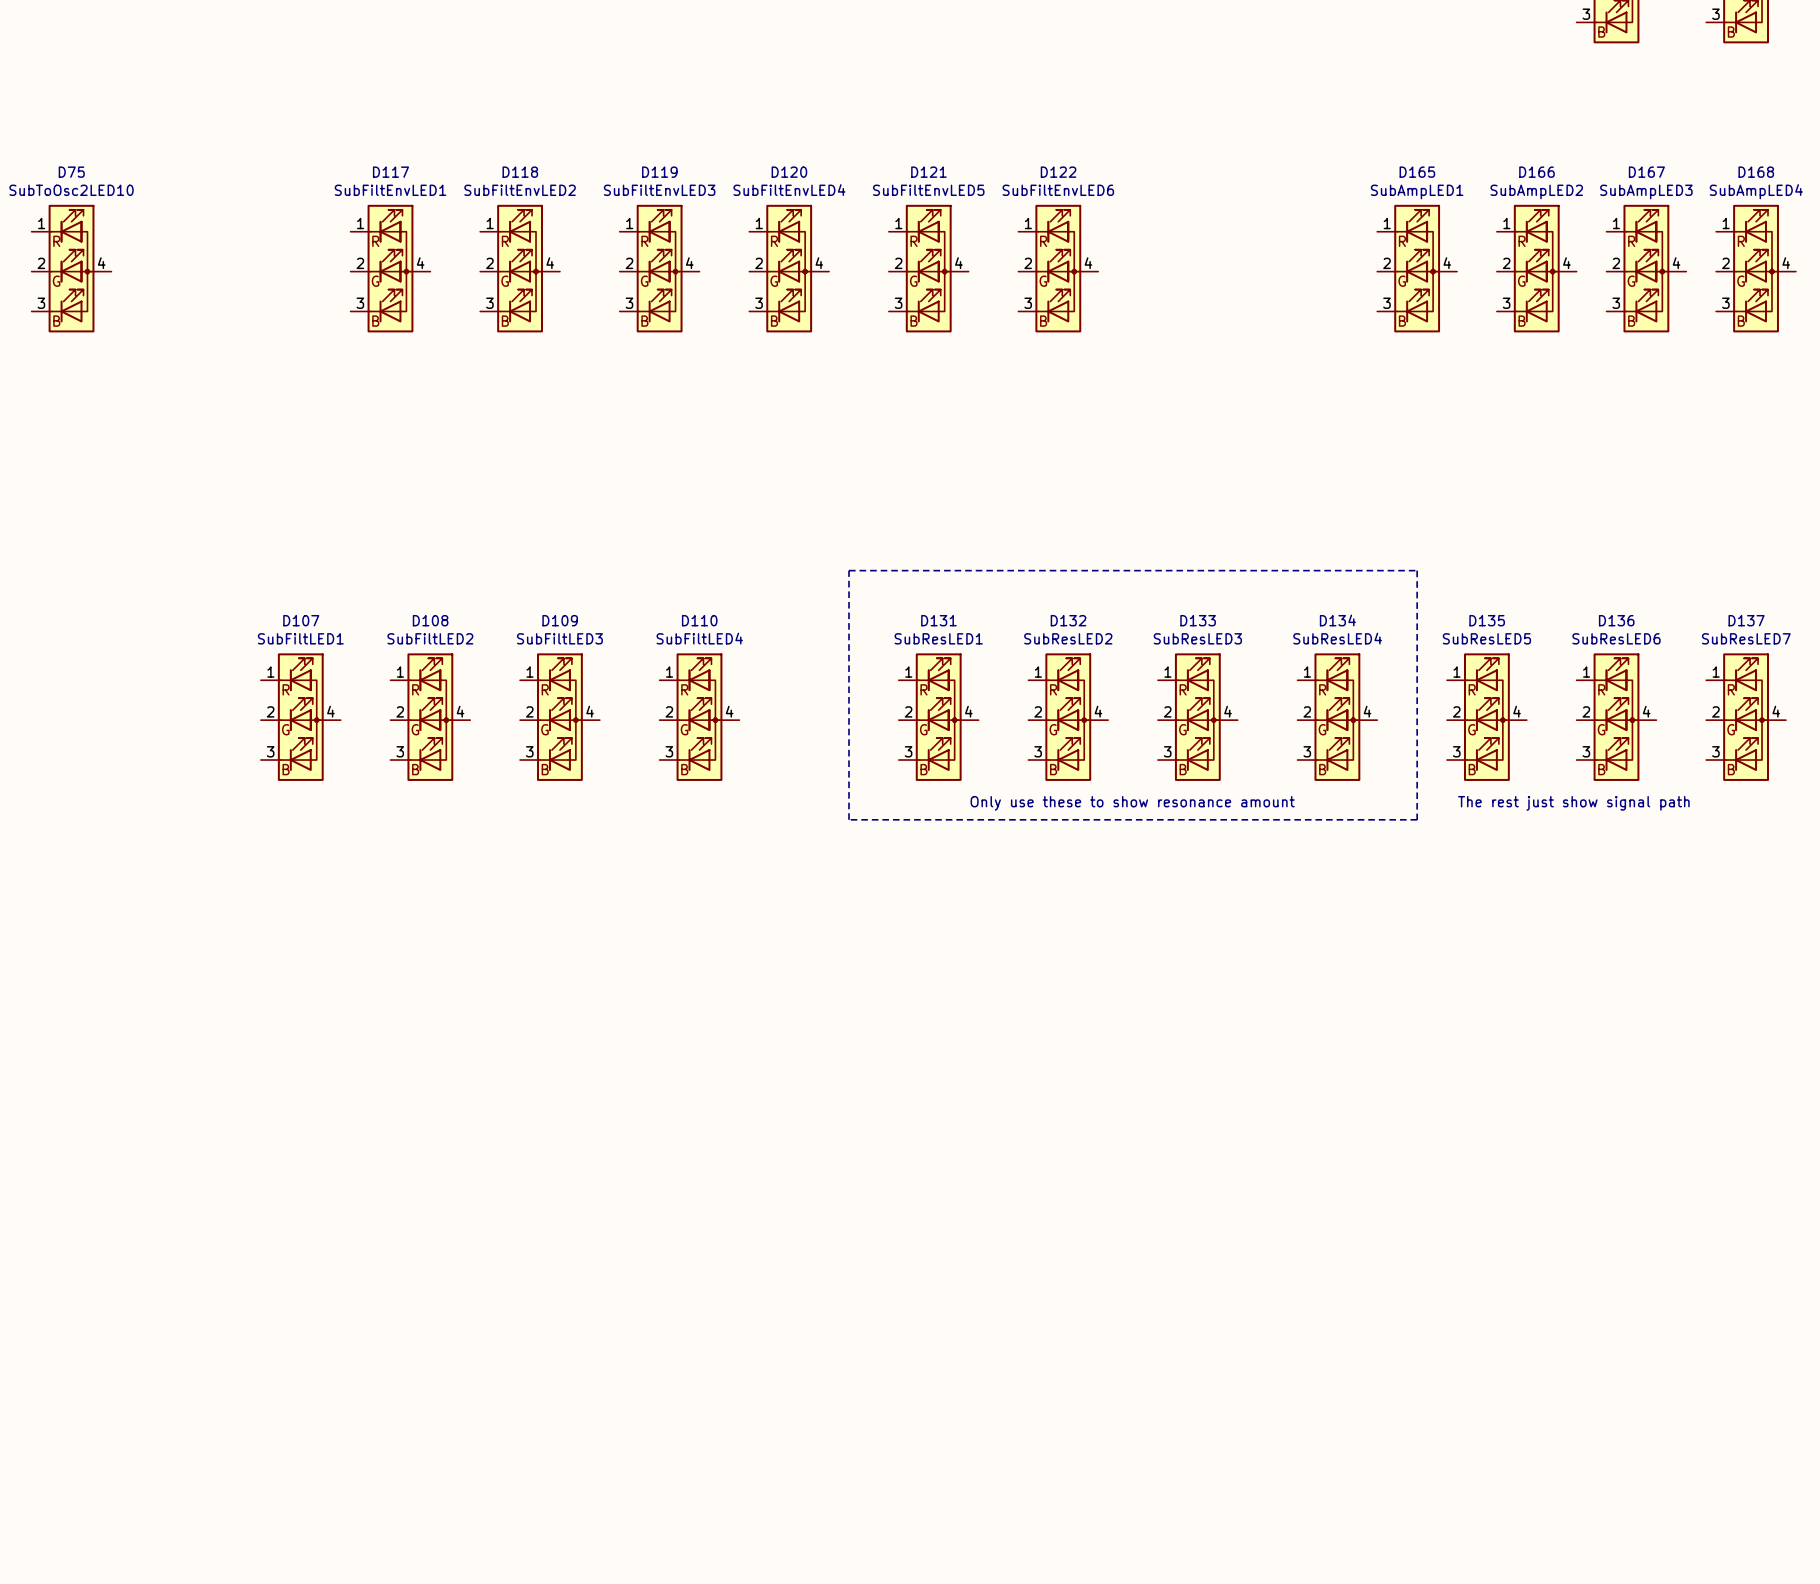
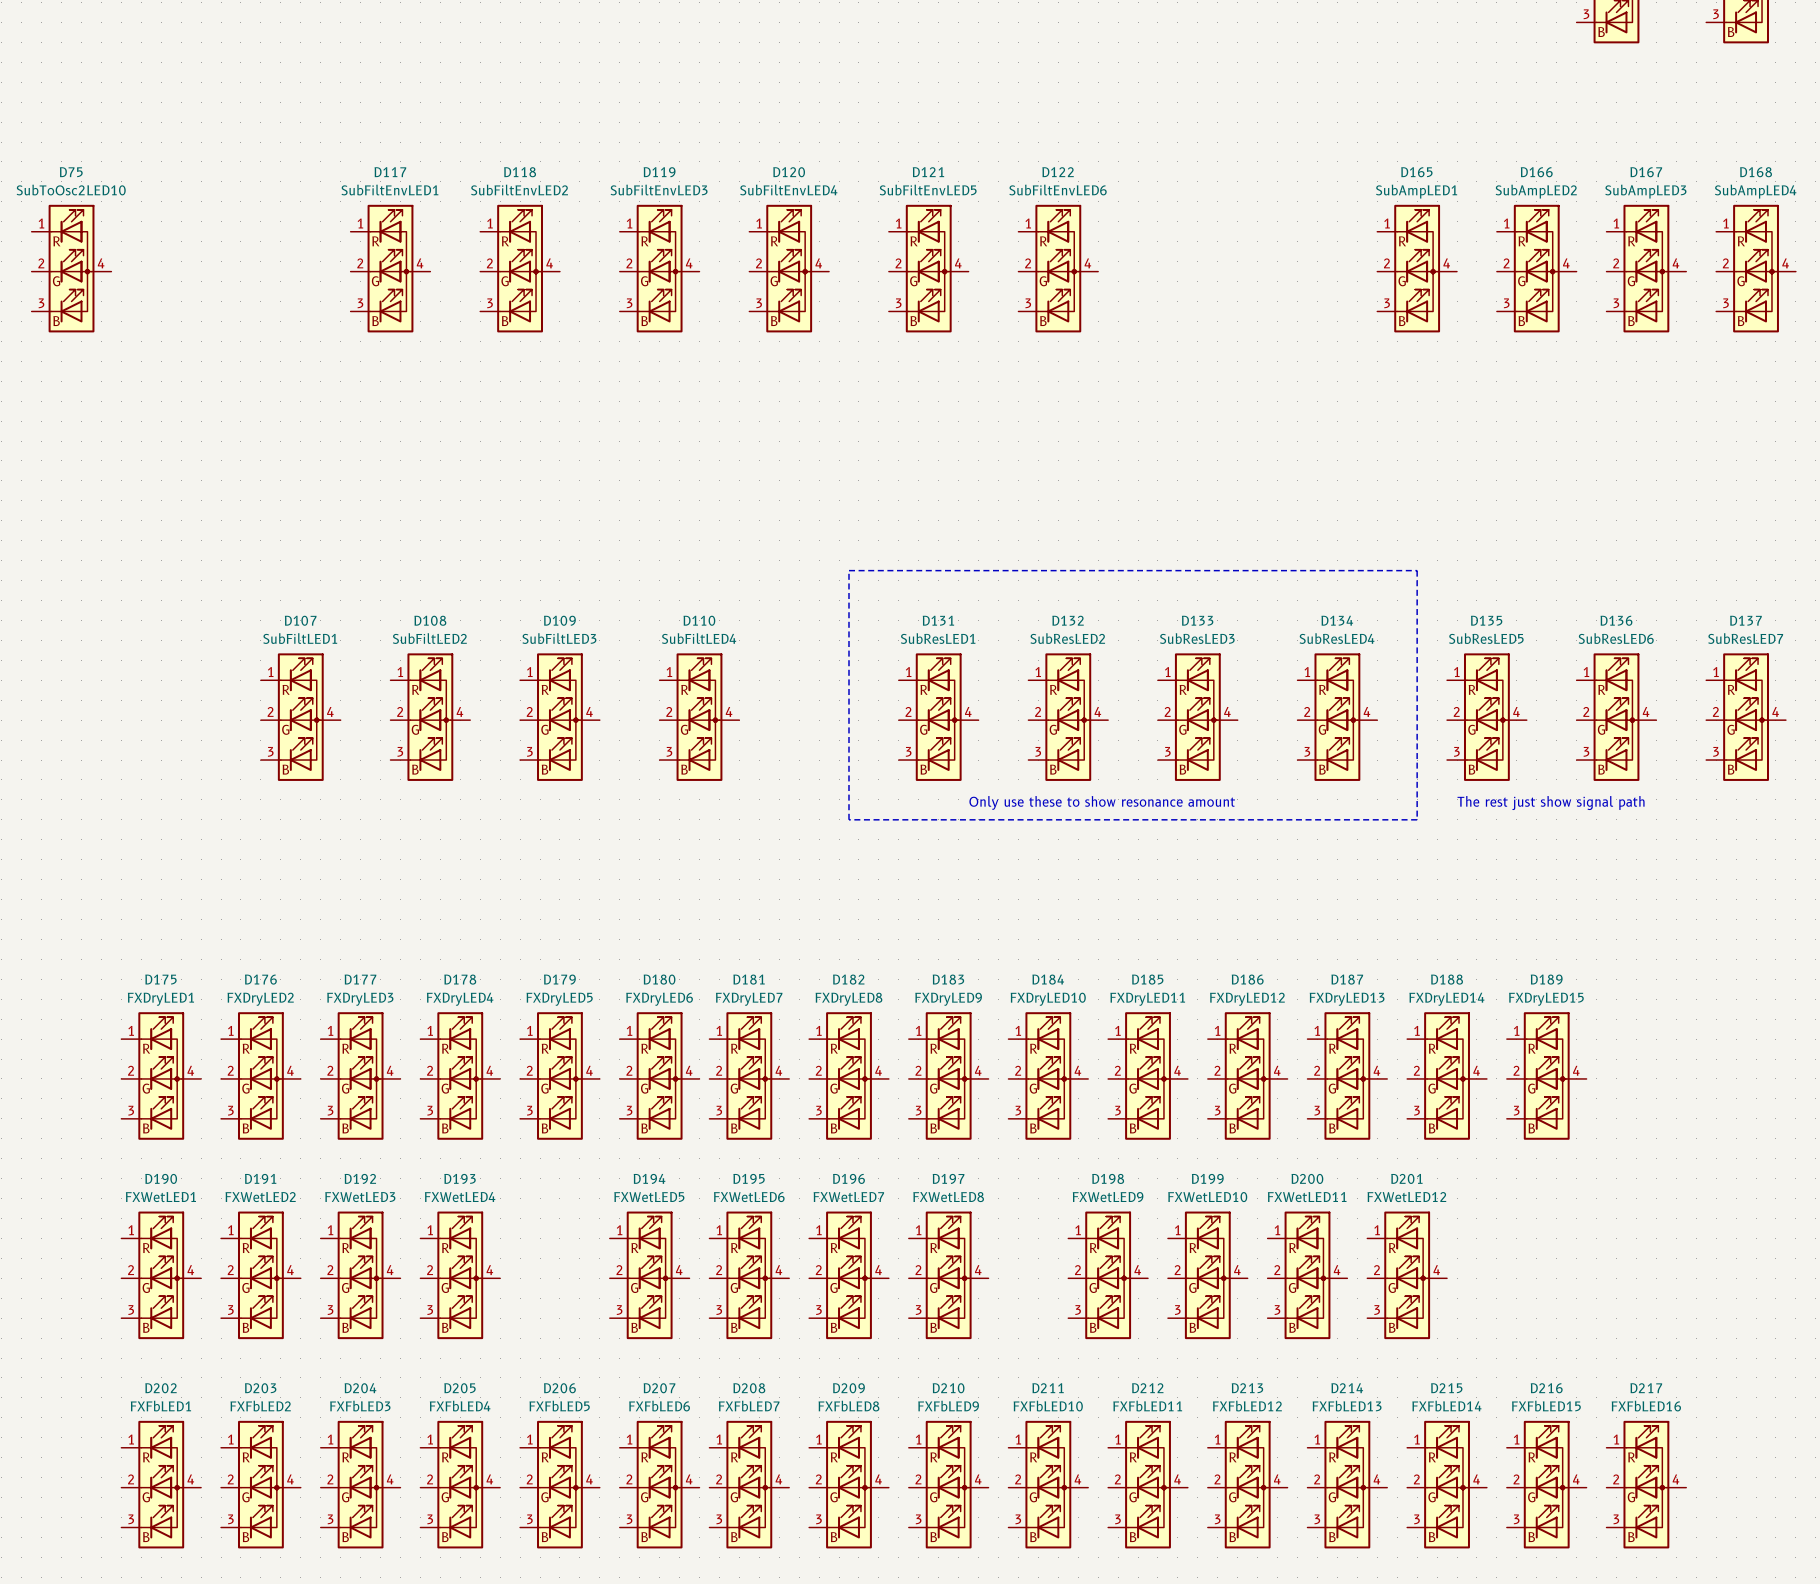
D175: none -> FXDryLED1 (161, 1075)
D176: none -> FXDryLED2 (260, 1075)
D177: none -> FXDryLED3 (360, 1075)
D178: none -> FXDryLED4 (460, 1075)
D179: none -> FXDryLED5 (559, 1075)
D180: none -> FXDryLED6 (659, 1075)
D181: none -> FXDryLED7 (749, 1075)
D182: none -> FXDryLED8 (848, 1075)
D183: none -> FXDryLED9 (948, 1075)
D184: none -> FXDryLED10 (1048, 1075)
D185: none -> FXDryLED11 (1148, 1075)
D186: none -> FXDryLED12 (1247, 1075)
D187: none -> FXDryLED13 (1347, 1075)
D188: none -> FXDryLED14 (1447, 1075)
D189: none -> FXDryLED15 (1546, 1075)
D190: none -> FXWetLED1 (161, 1275)
D191: none -> FXWetLED2 (260, 1275)
D192: none -> FXWetLED3 (360, 1275)
D193: none -> FXWetLED4 (460, 1275)
D194: none -> FXWetLED5 (649, 1275)
D195: none -> FXWetLED6 (749, 1275)
D196: none -> FXWetLED7 (848, 1275)
D197: none -> FXWetLED8 (948, 1275)
D198: none -> FXWetLED9 (1108, 1275)
D199: none -> FXWetLED10 (1207, 1275)
D200: none -> FXWetLED11 (1307, 1275)
D201: none -> FXWetLED12 (1407, 1275)
D202: none -> FXFbLED1 (161, 1484)
D203: none -> FXFbLED2 (260, 1484)
D204: none -> FXFbLED3 (360, 1484)
D205: none -> FXFbLED4 (460, 1484)
D206: none -> FXFbLED5 (559, 1484)
D207: none -> FXFbLED6 (659, 1484)
D208: none -> FXFbLED7 (749, 1484)
D209: none -> FXFbLED8 (848, 1484)
D210: none -> FXFbLED9 (948, 1484)
D211: none -> FXFbLED10 (1048, 1484)
D212: none -> FXFbLED11 (1148, 1484)
D213: none -> FXFbLED12 (1247, 1484)
D214: none -> FXFbLED13 (1347, 1484)
D215: none -> FXFbLED14 (1447, 1484)
D216: none -> FXFbLED15 (1546, 1484)
D217: none -> FXFbLED16 (1646, 1484)

